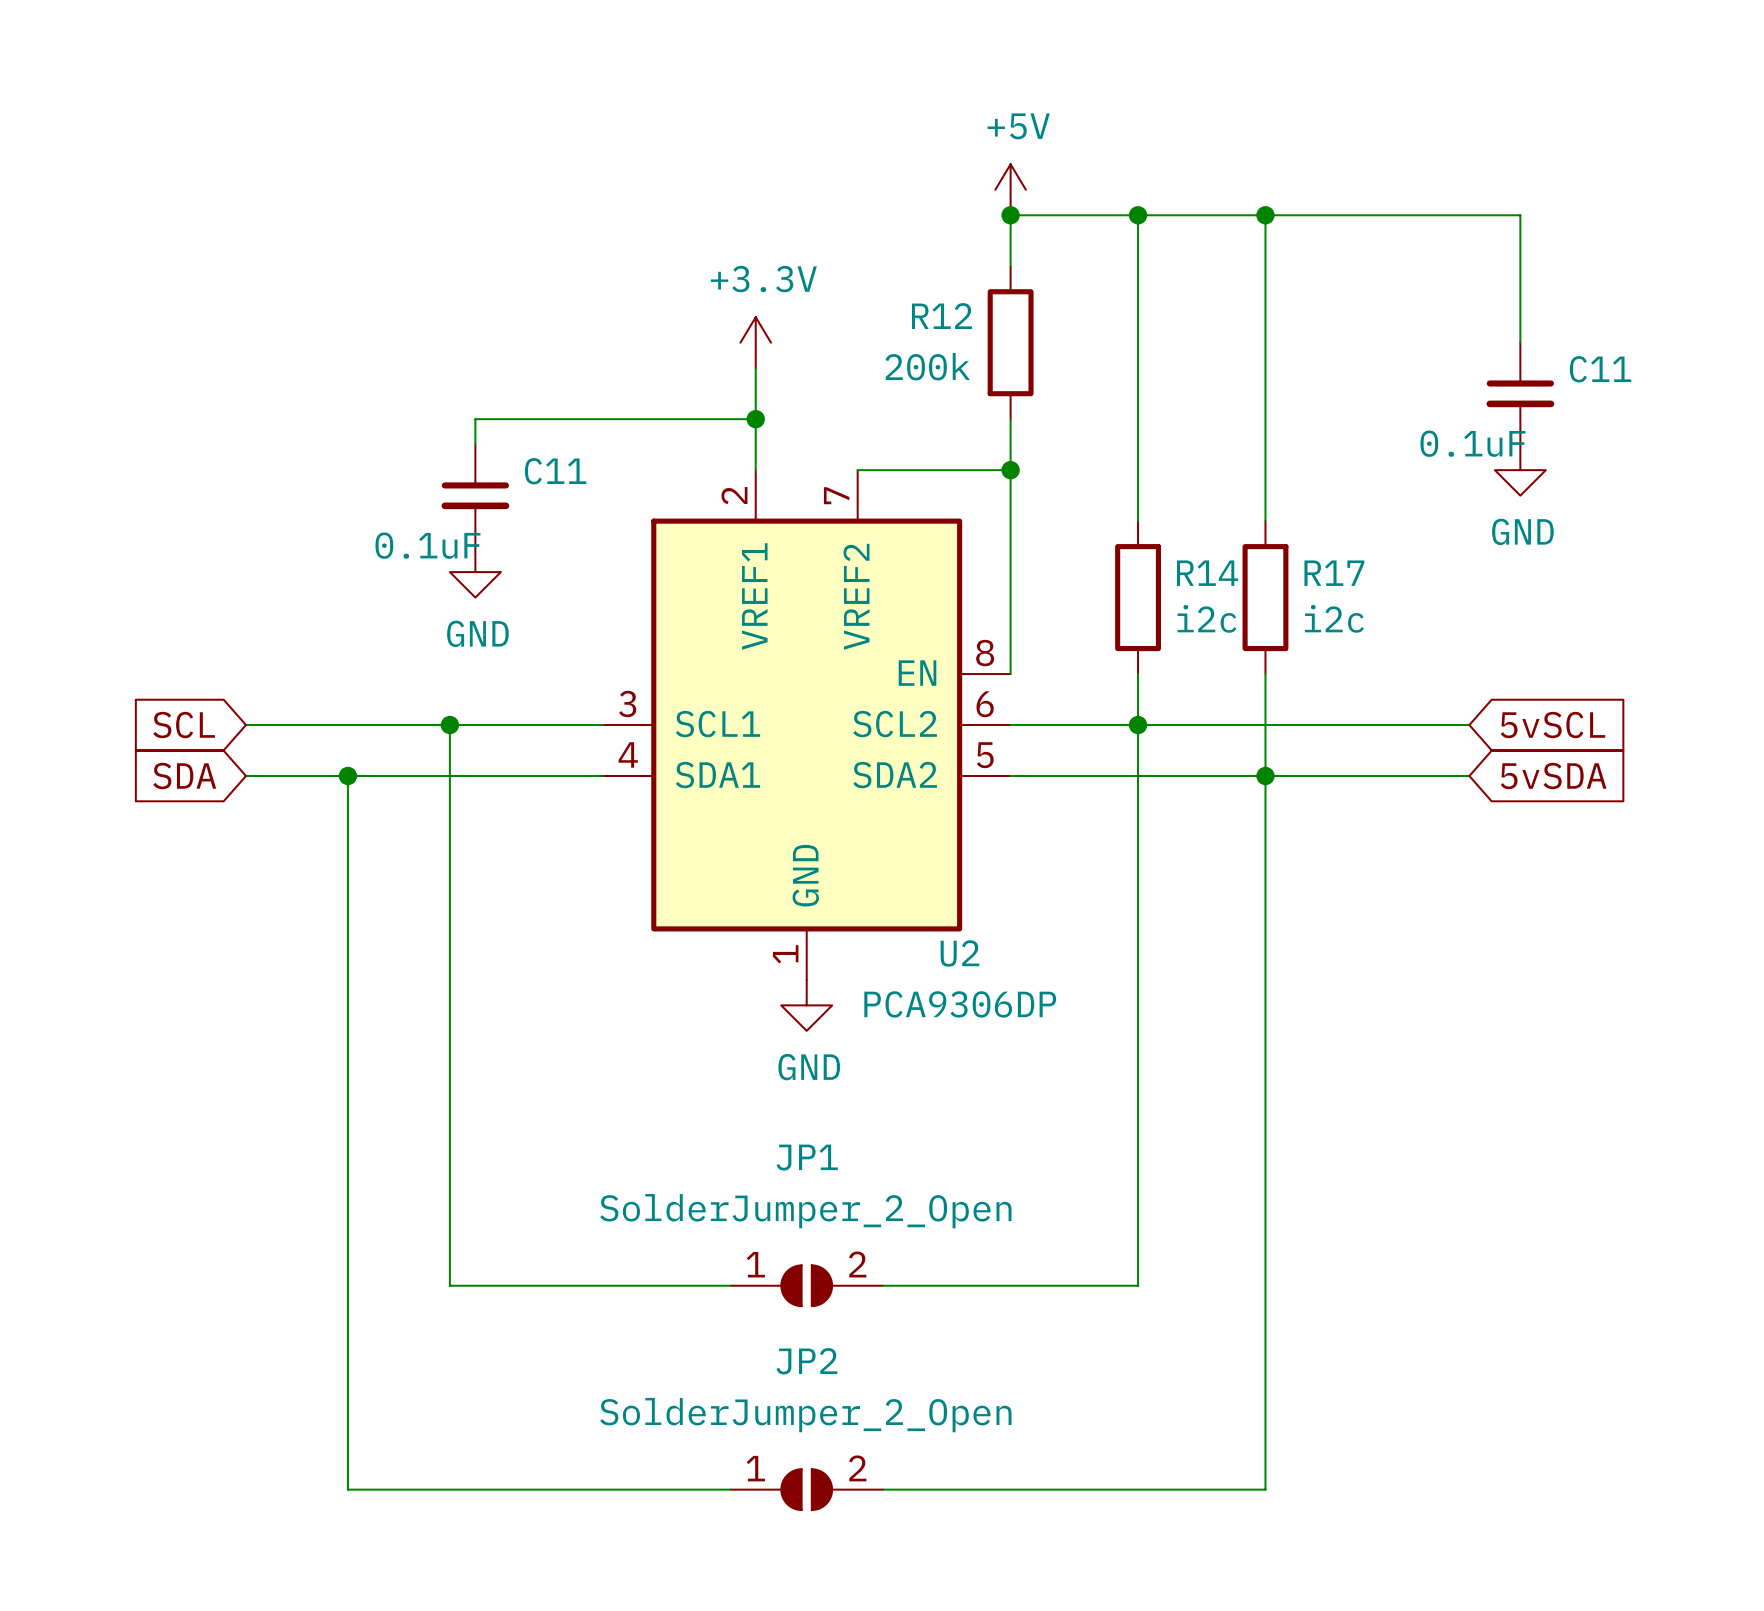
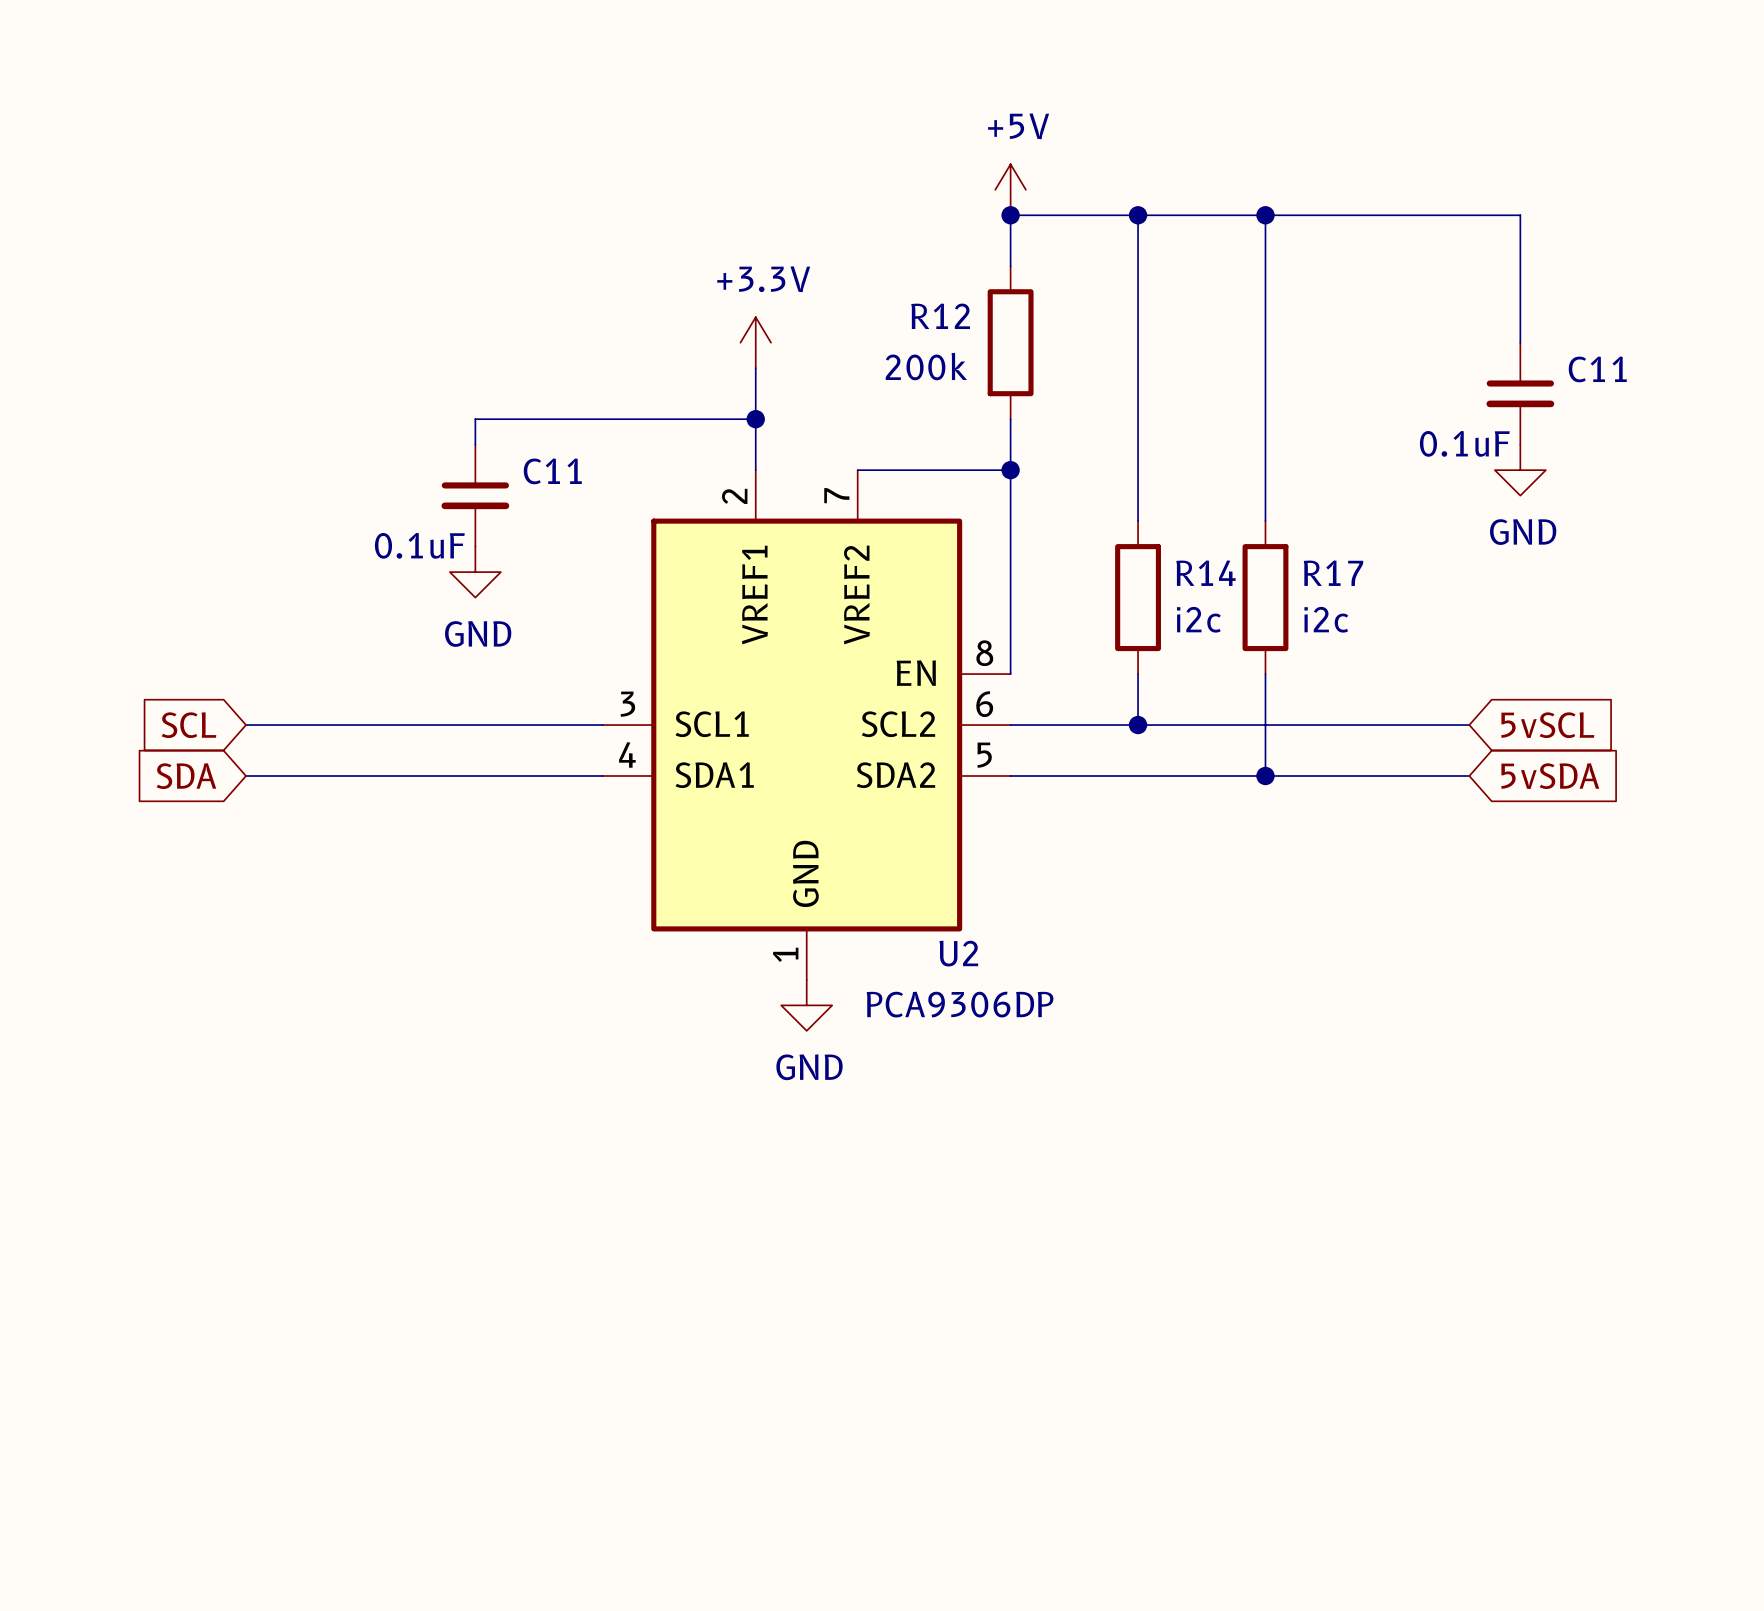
wire: (449, 725) (449, 1285) (730, 1285) -> none
junction: (449, 725) -> none
wire: (1138, 725) (1138, 1285) (883, 1285) -> none
wire: (347, 776) (347, 1489) (730, 1489) -> none
junction: (347, 776) -> none
wire: (1265, 776) (1265, 1489) (883, 1489) -> none
JP1: SolderJumper_2_Open (806, 1285) -> none
JP2: SolderJumper_2_Open (806, 1489) -> none

